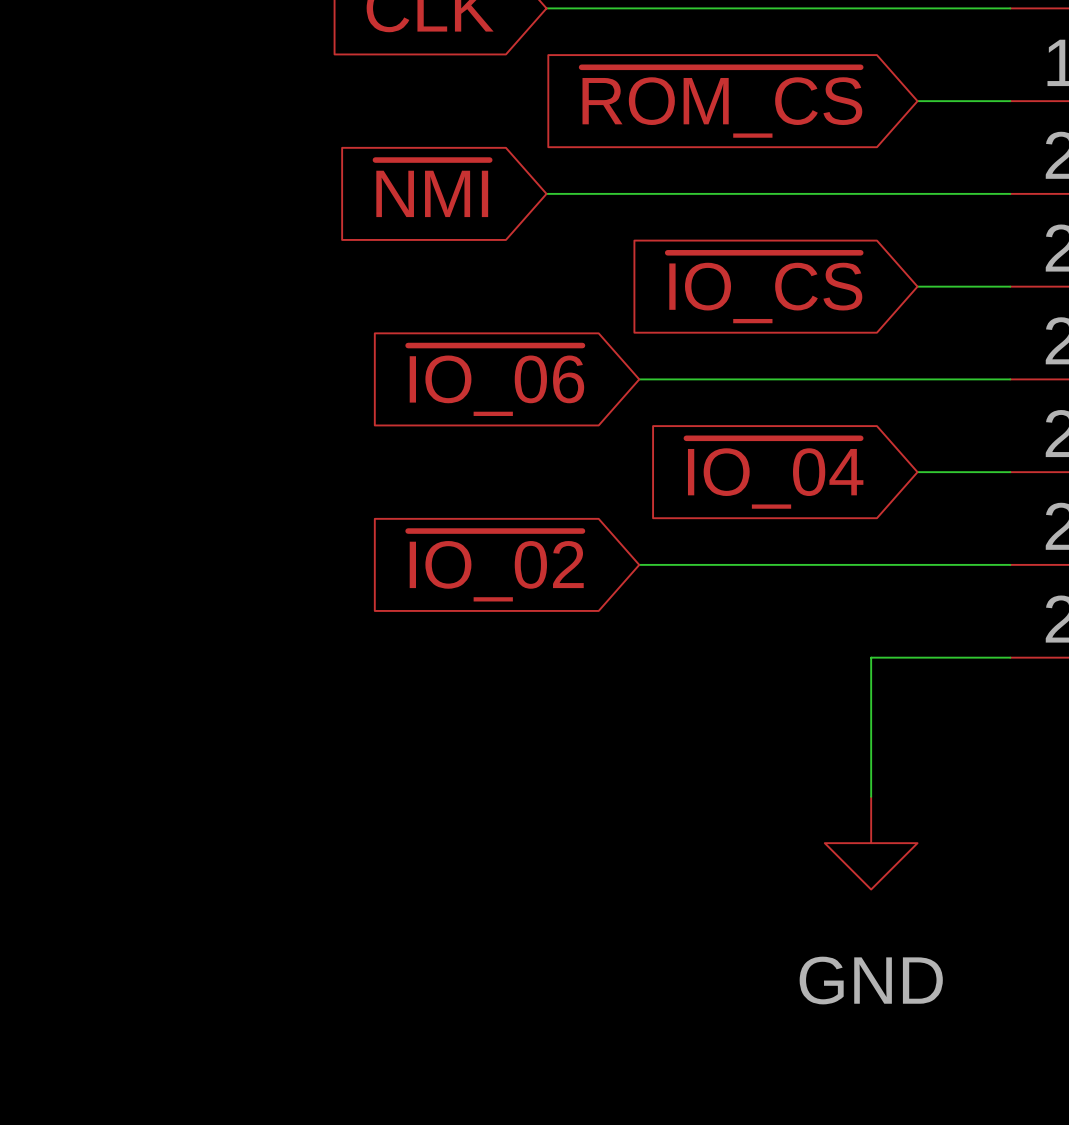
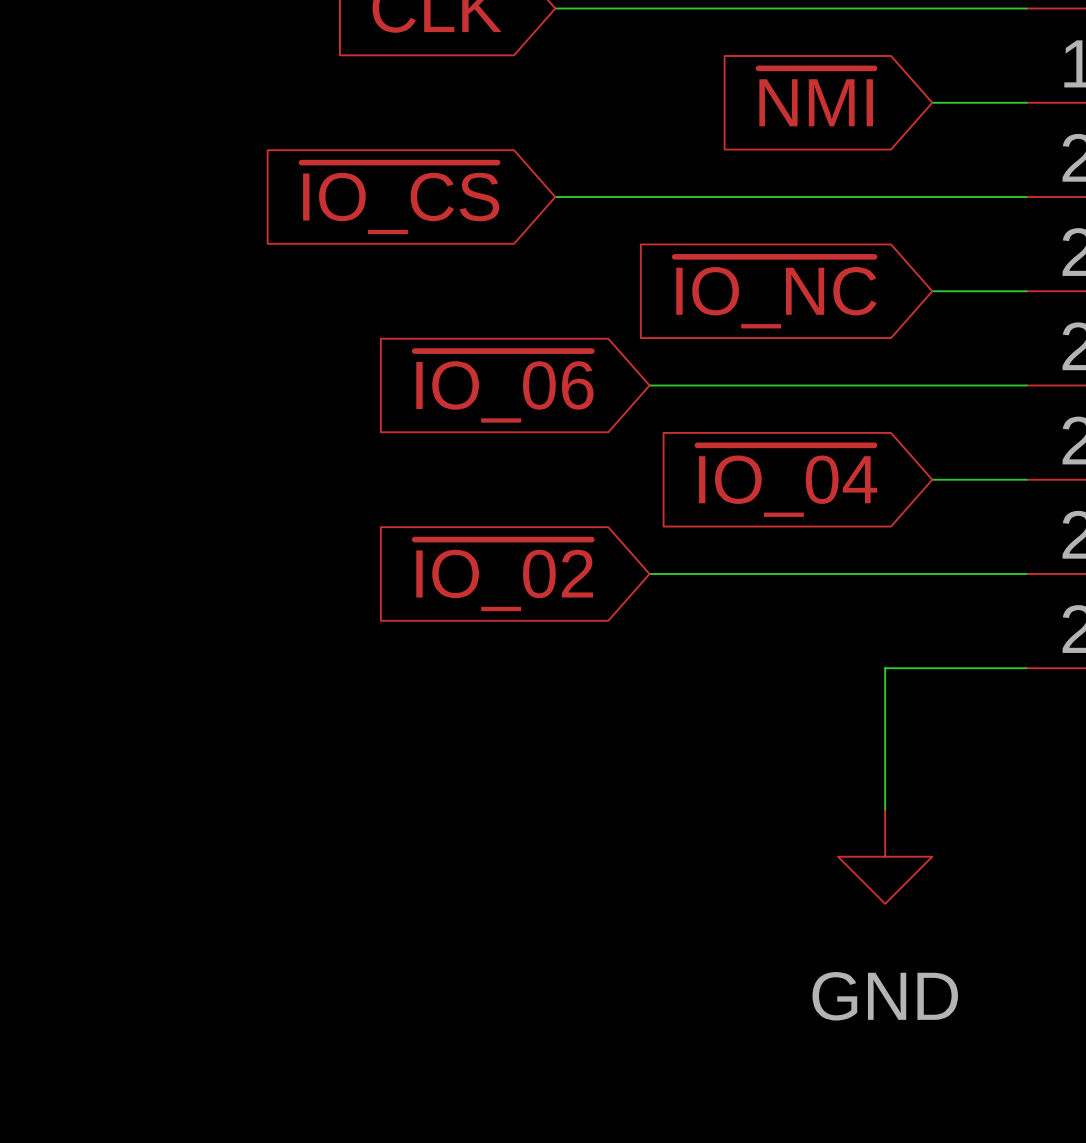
global label: ~{ROM_CS} (721, 102) -> ~{NMI} (816, 97)
global label: ~{NMI} (432, 188) -> ~{IO_CS} (400, 198)
global label: ~{IO_CS} (764, 288) -> ~{IO_NC} (775, 292)

